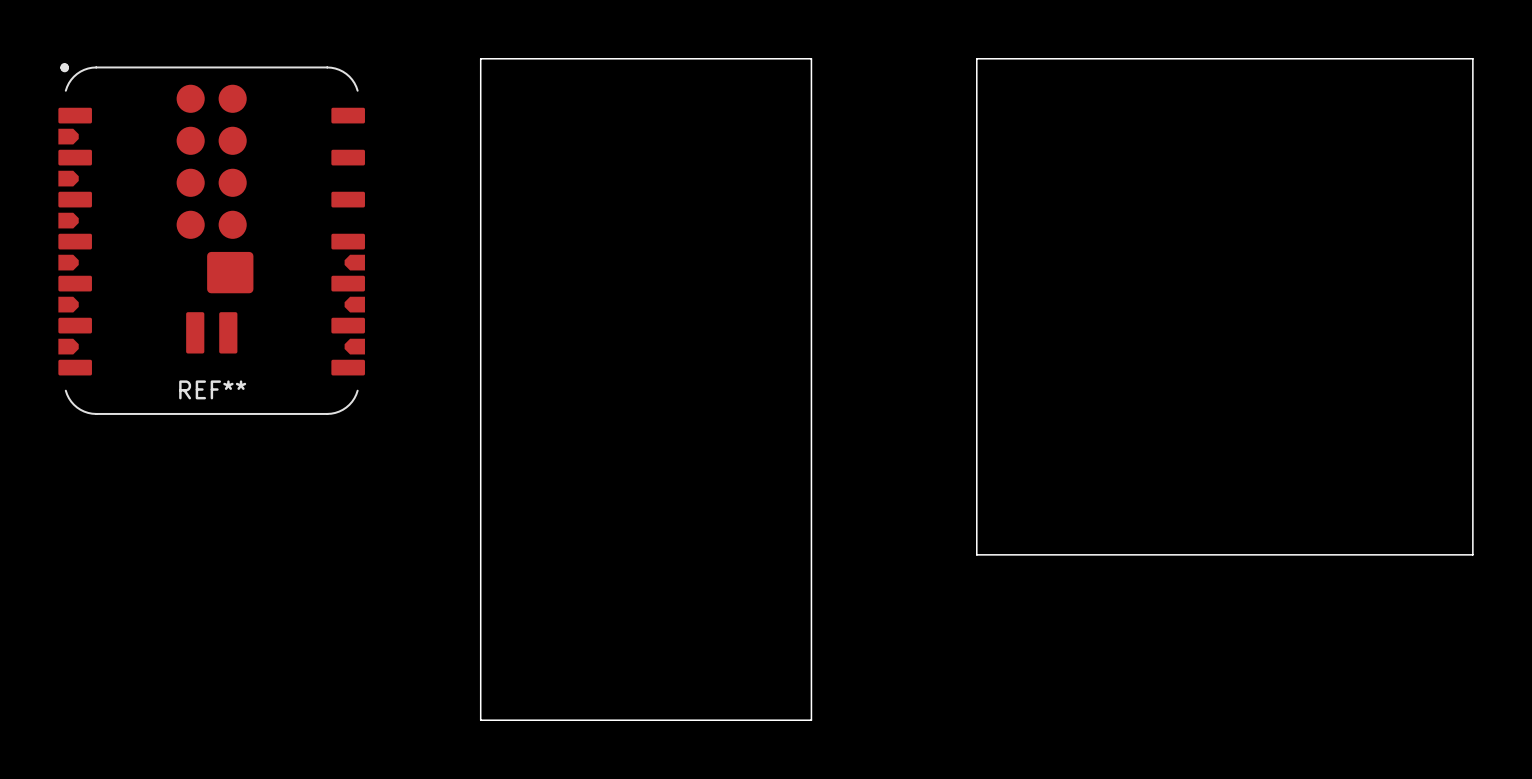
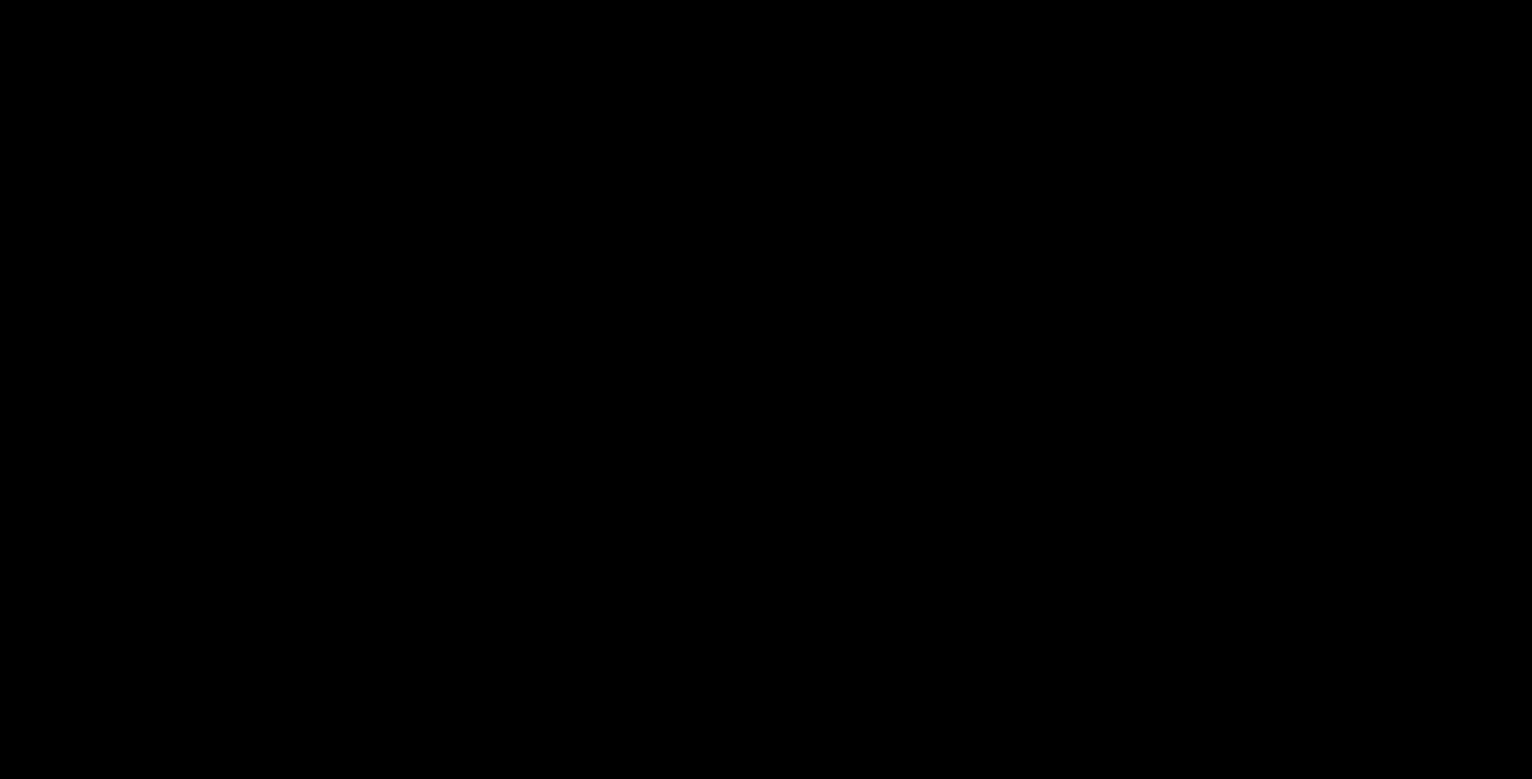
board edge: (480, 58) (811, 58) (811, 720) (480, 720) (480, 58) -> none
board edge: (976, 58) (1472, 58) (1472, 554) (976, 554) (976, 58) -> none
REF**: (211, 238) -> none

